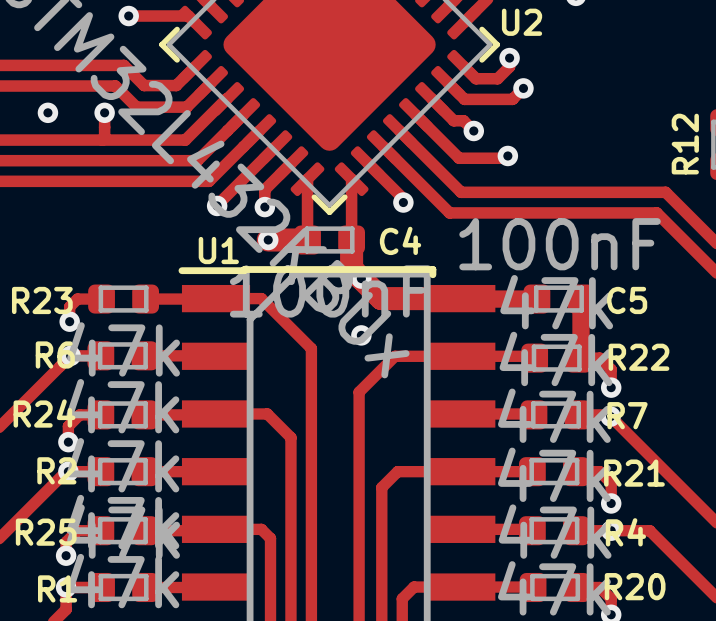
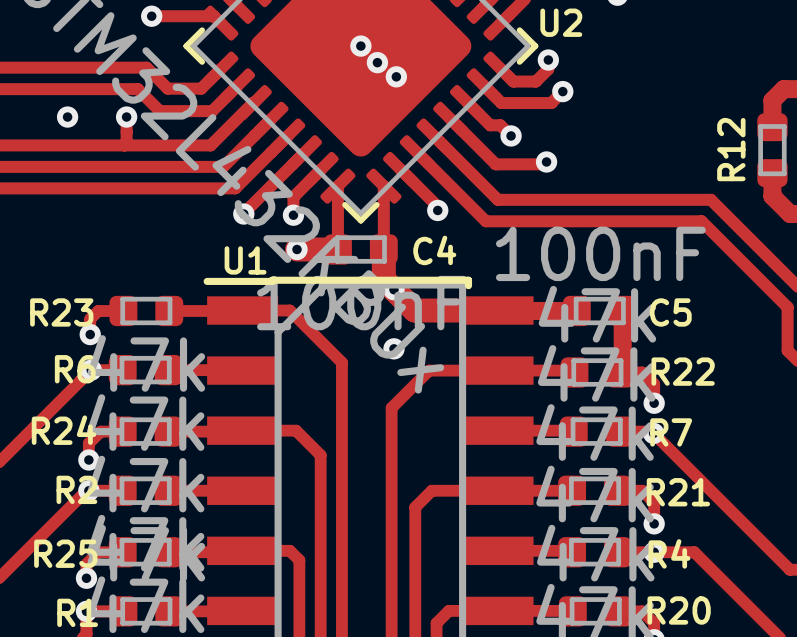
via: none -> (360, 46)
via: none -> (377, 62)
via: none -> (396, 76)

